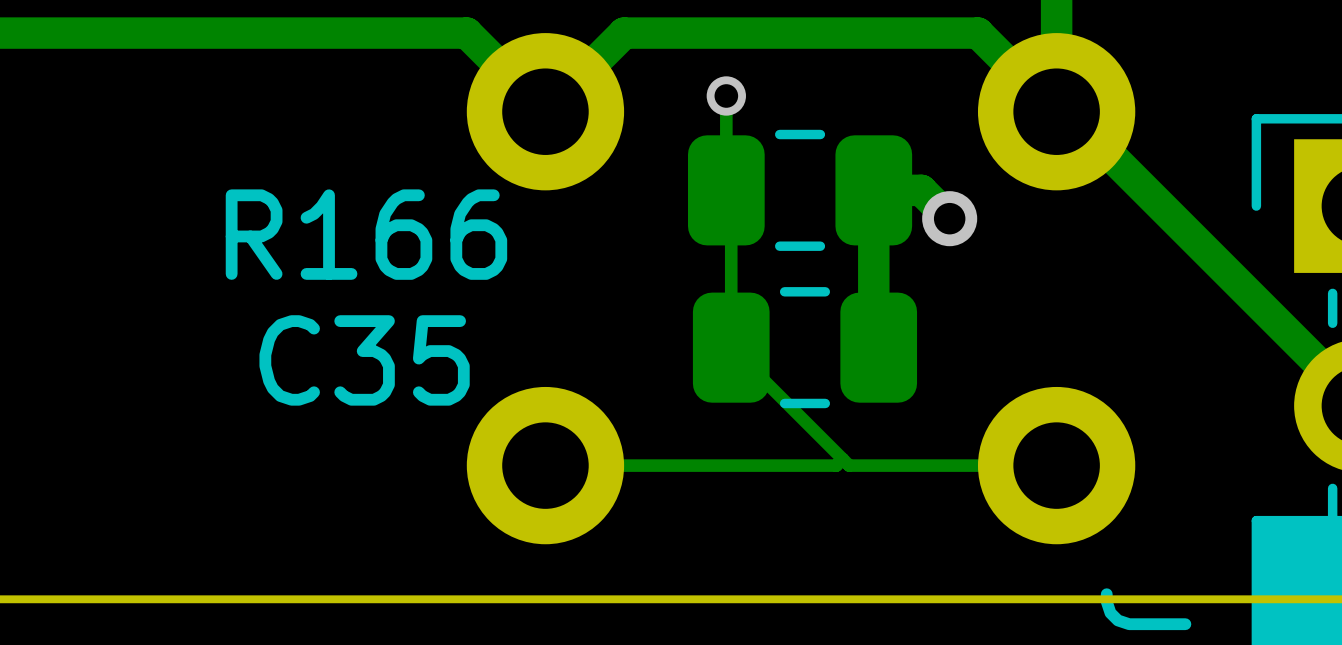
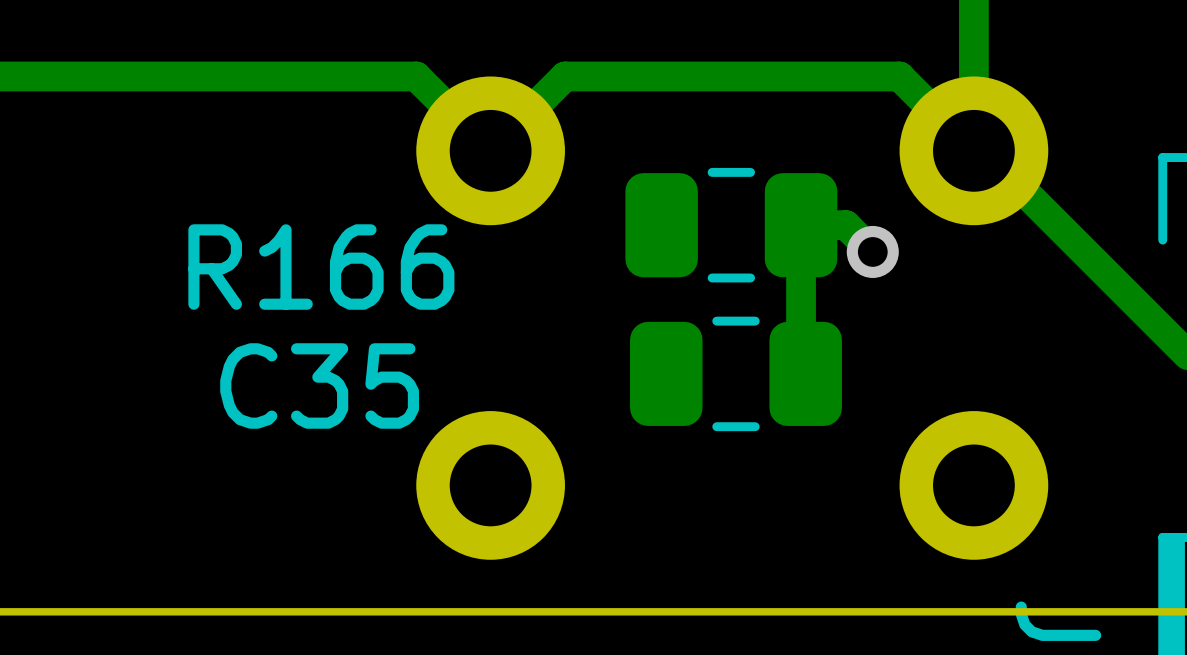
track: (726, 95) (726, 190) (731, 195) (731, 347) (849, 465) (1056, 465) -> none
via: (726, 95) -> none
track: (842, 459) (836, 465) (545, 465) -> none

